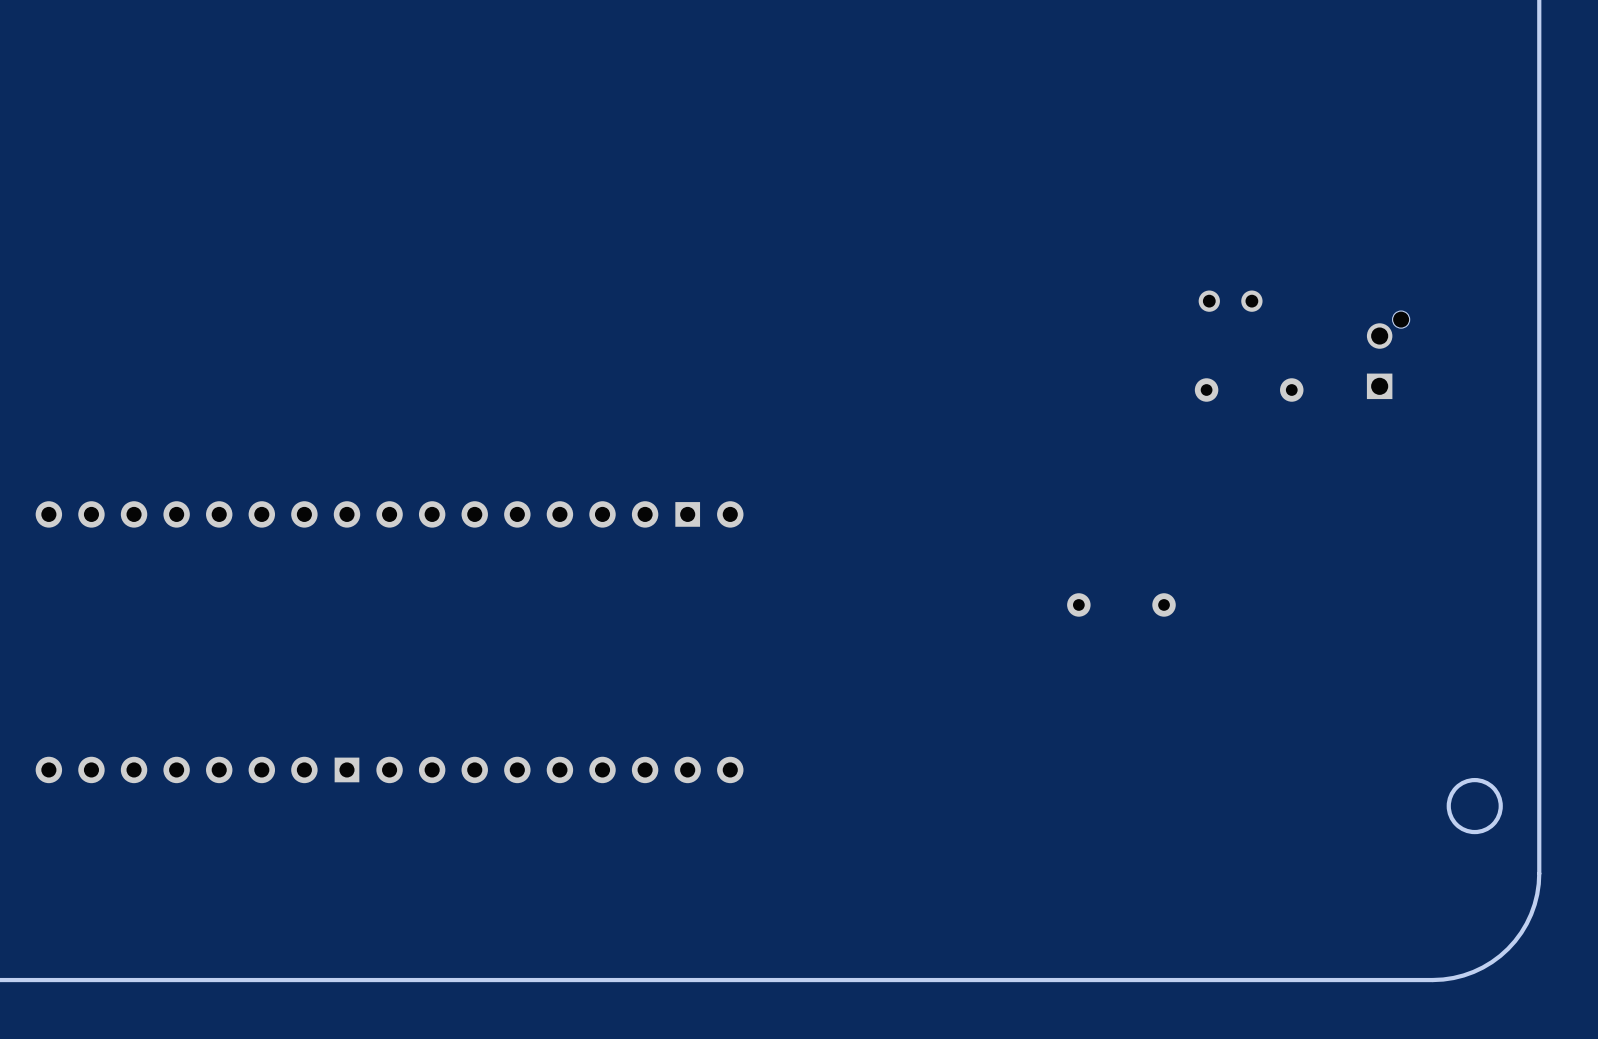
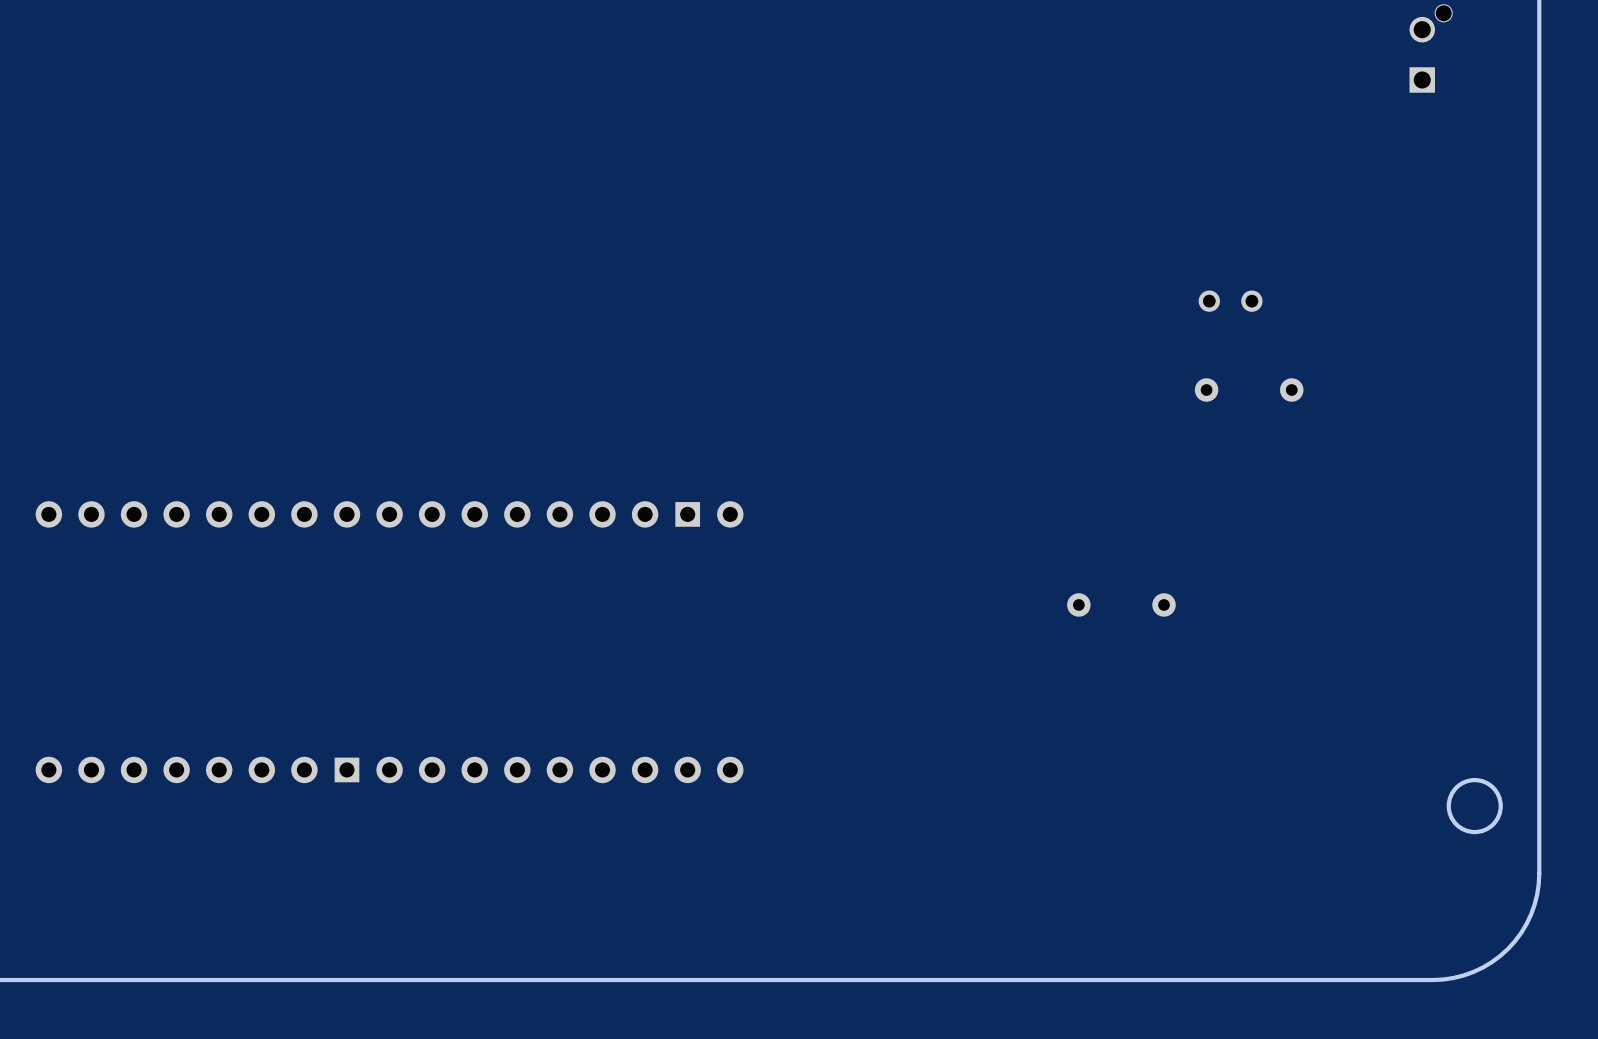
part position: (1388, 355) -> (1430, 48)

